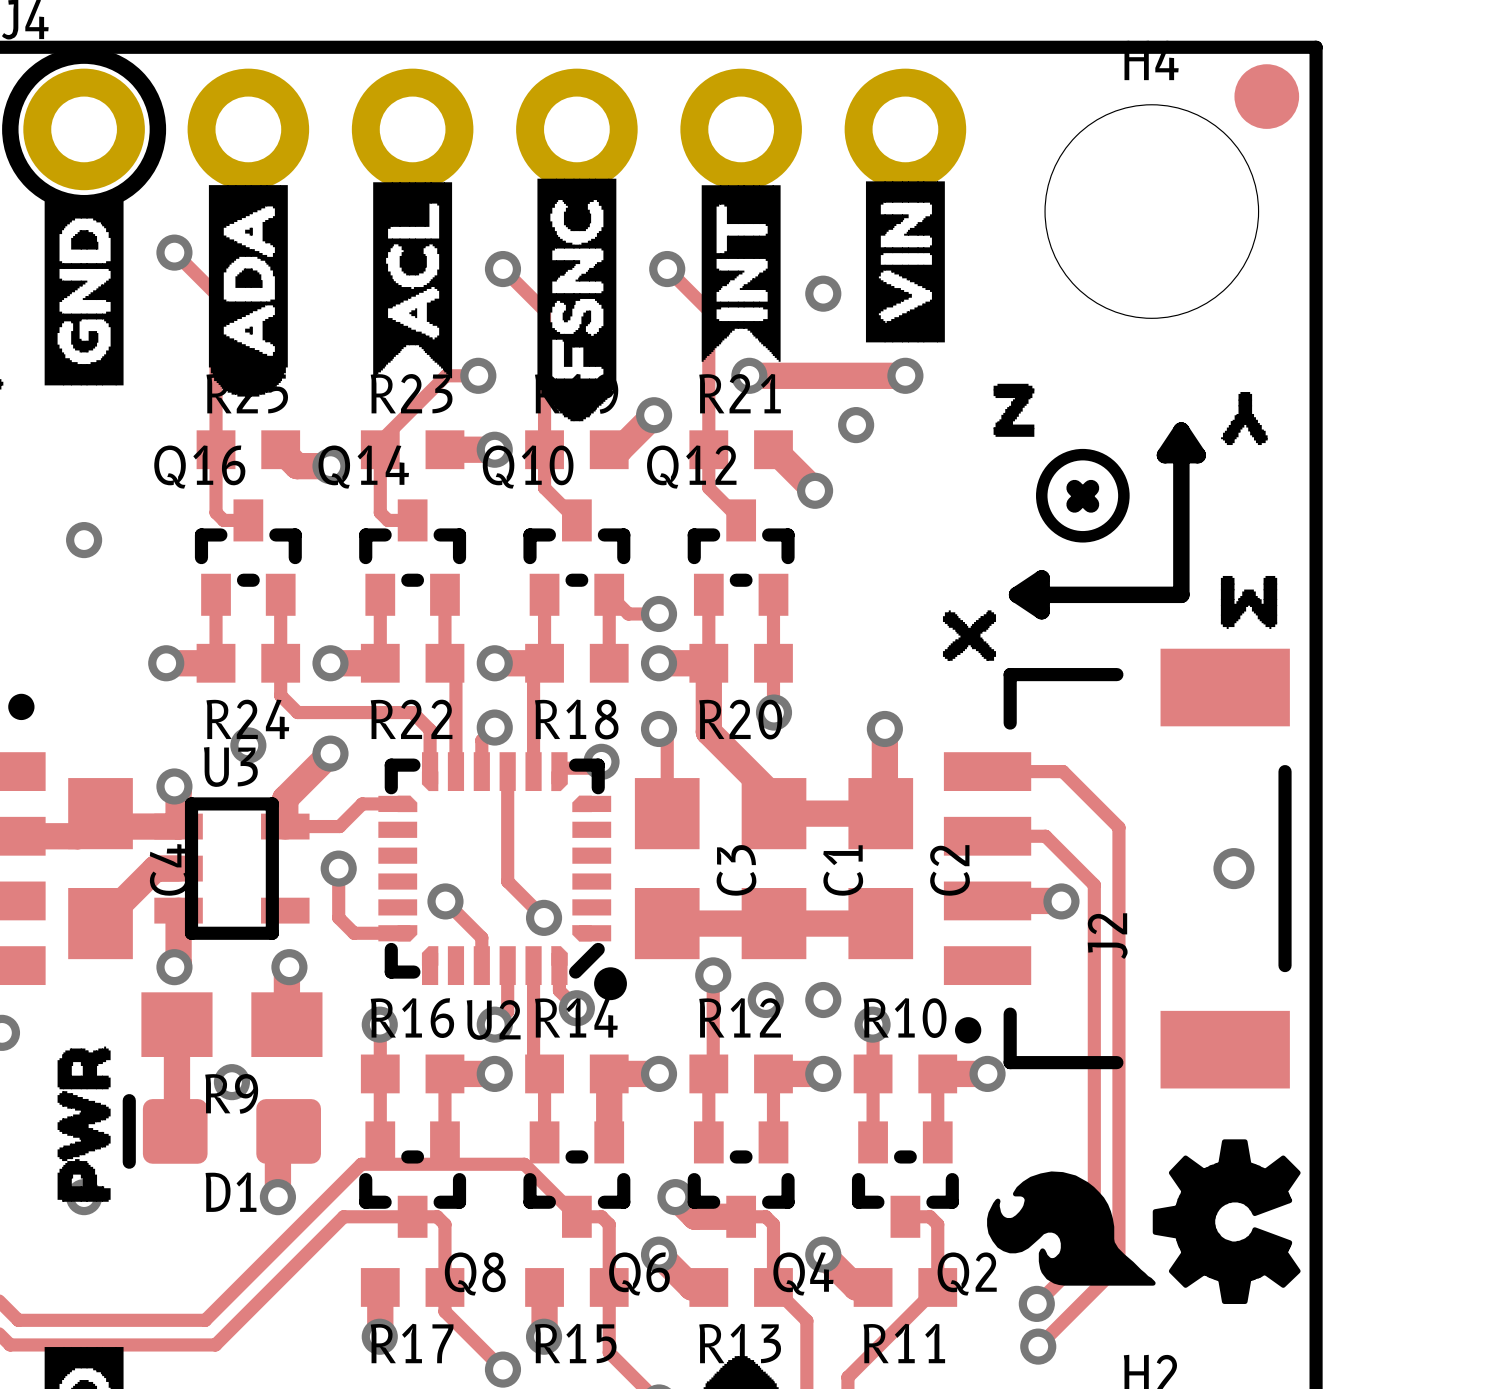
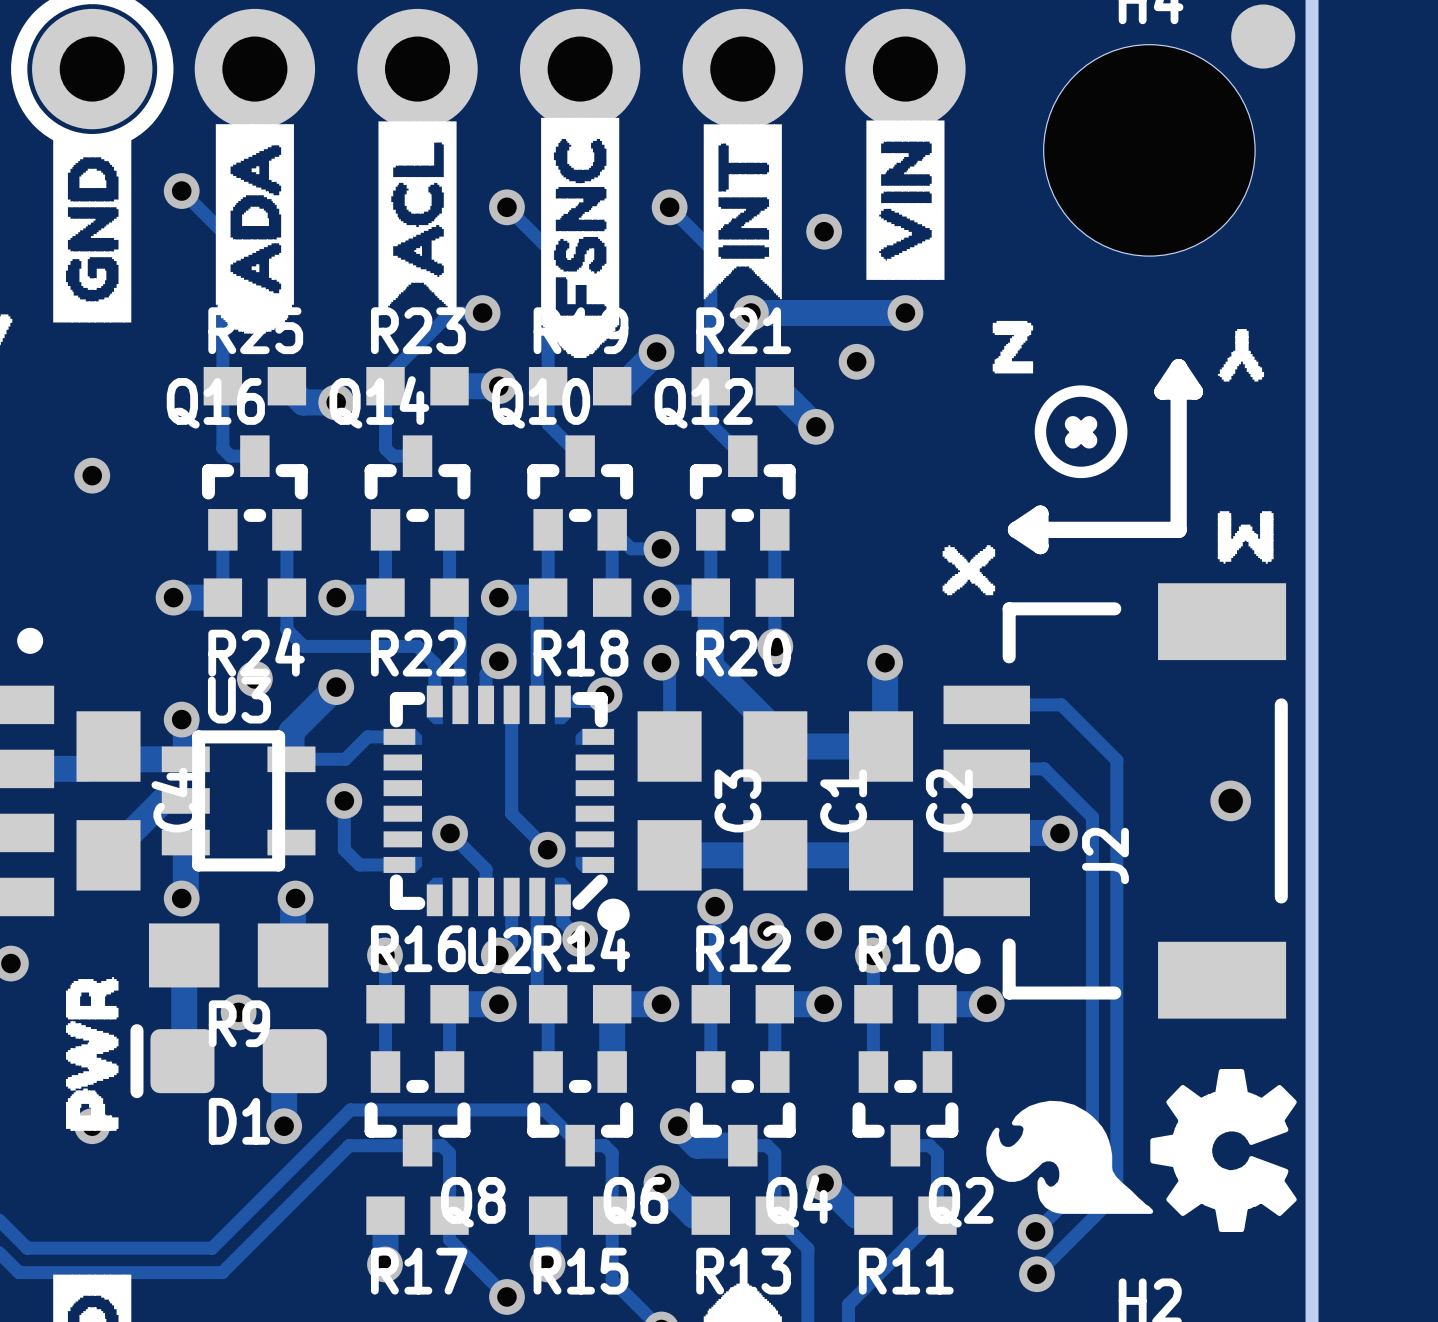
track: (344, 1180) (361, 1164) (524, 1164) (540, 1180) -> (350, 1109) (544, 1109)

